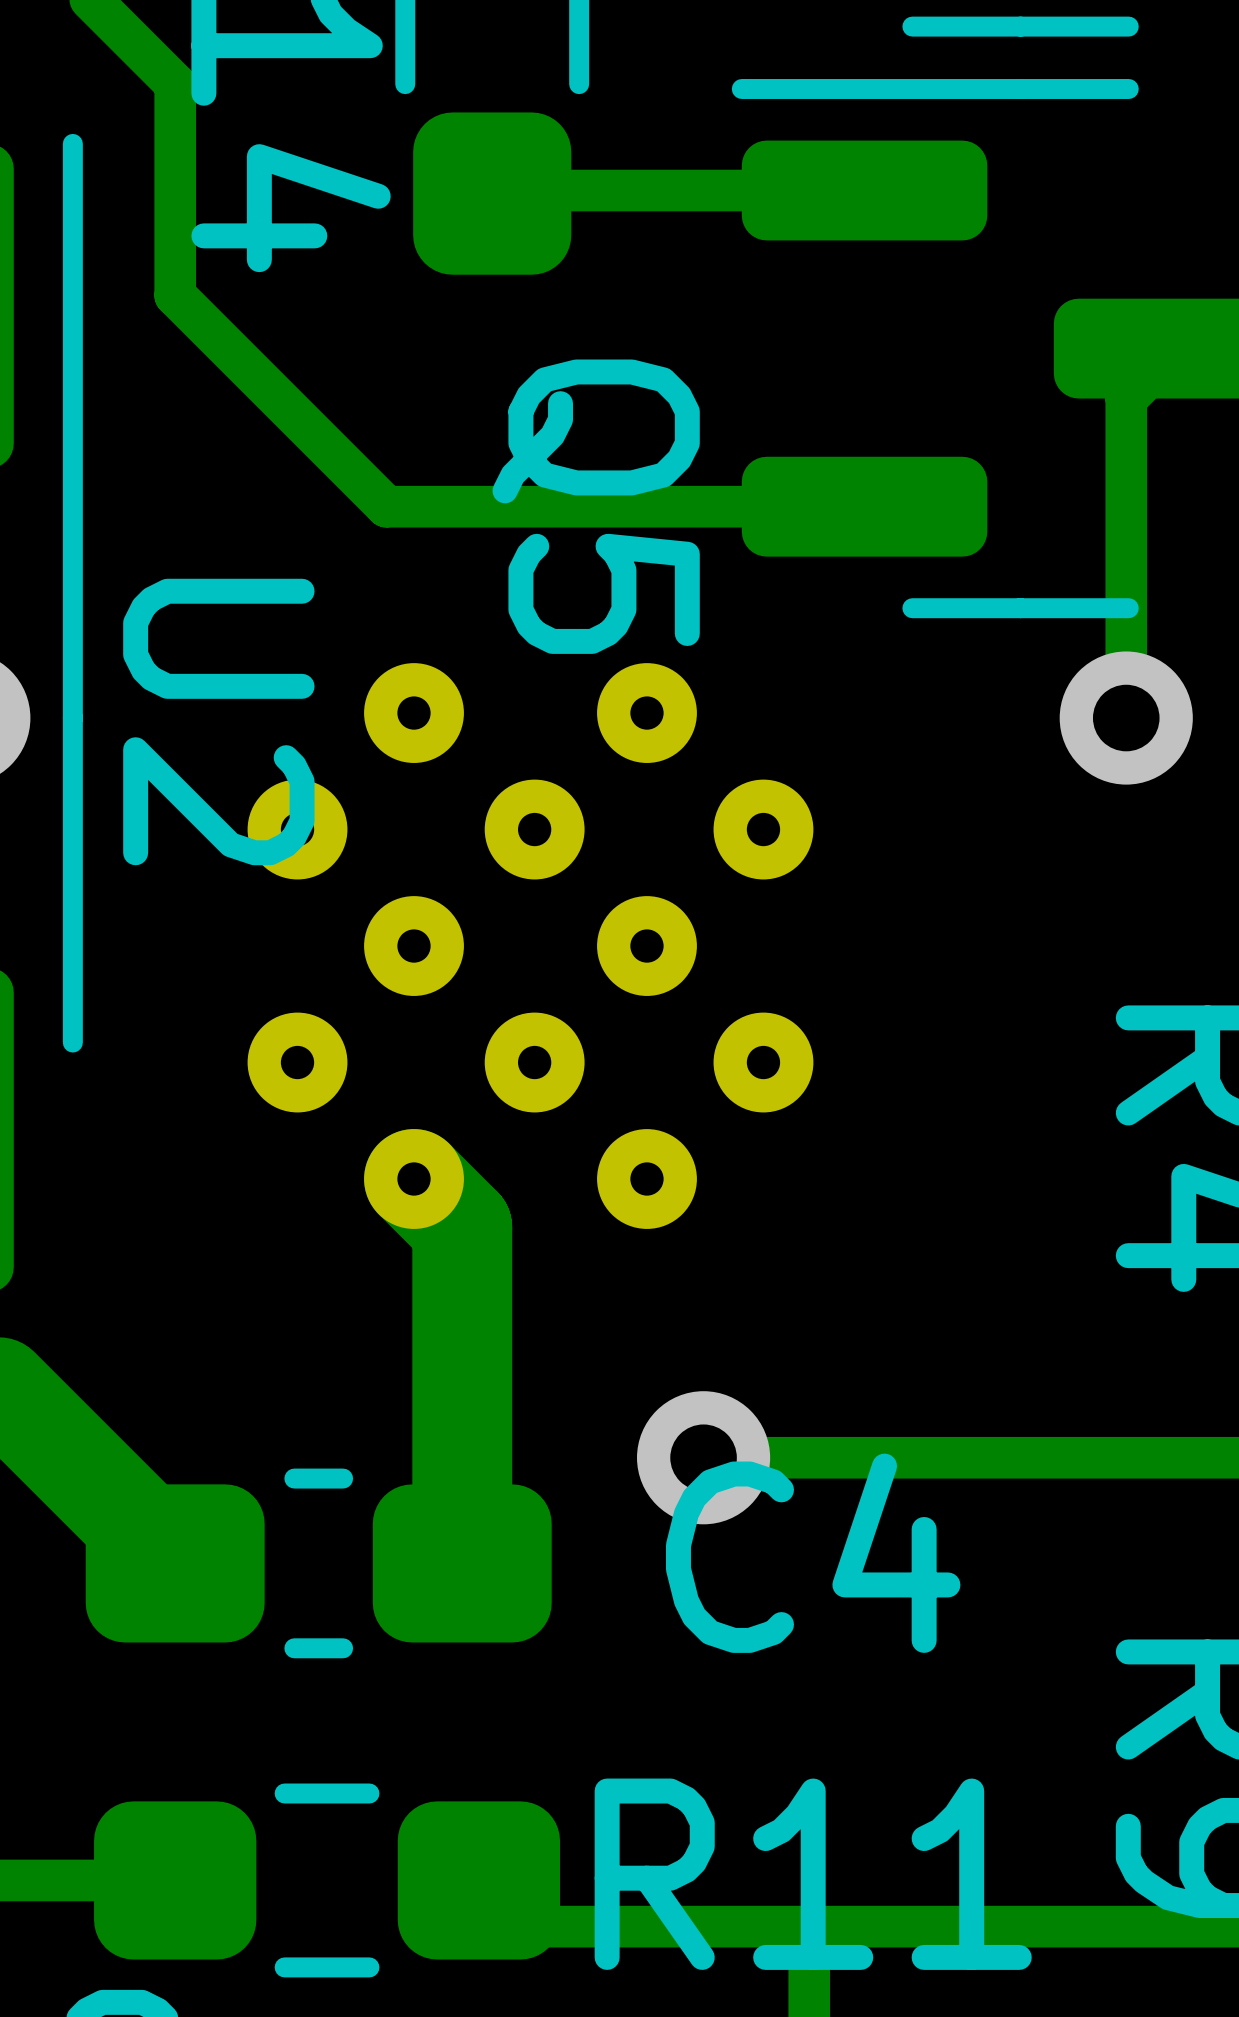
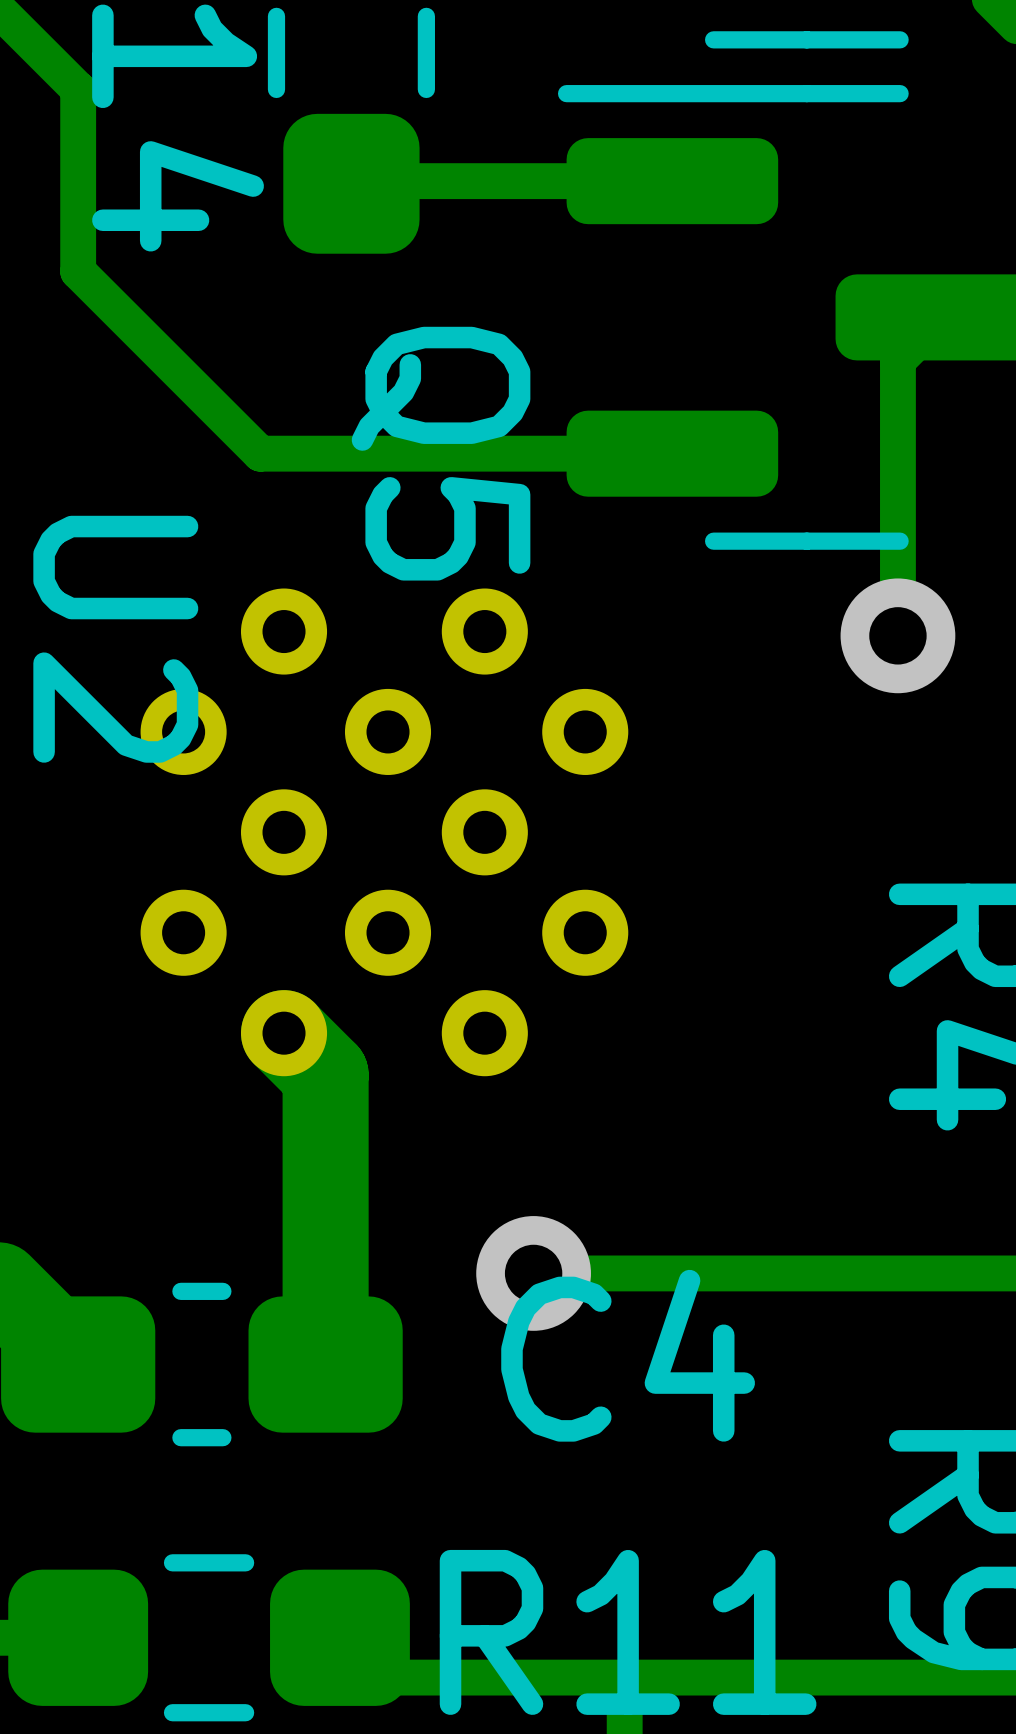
part footprint: [247, 663, 814, 1229] -> [140, 588, 629, 1077]

